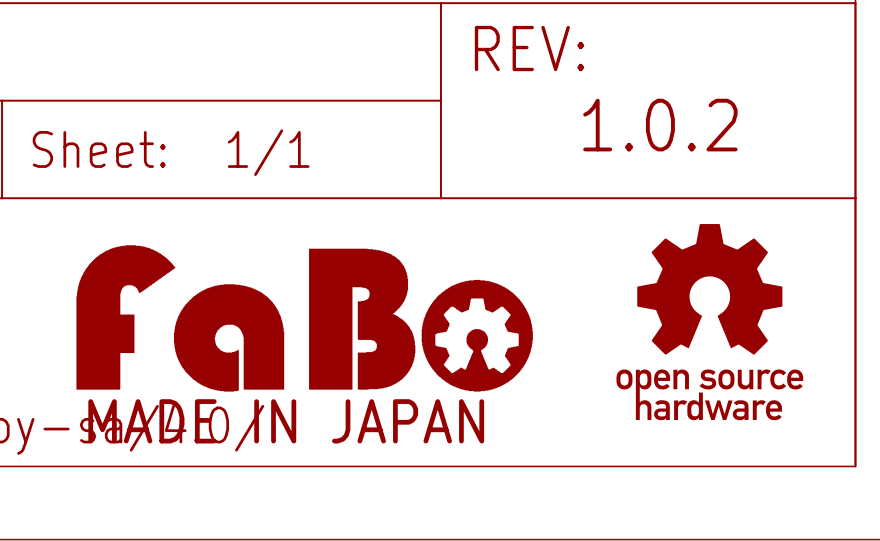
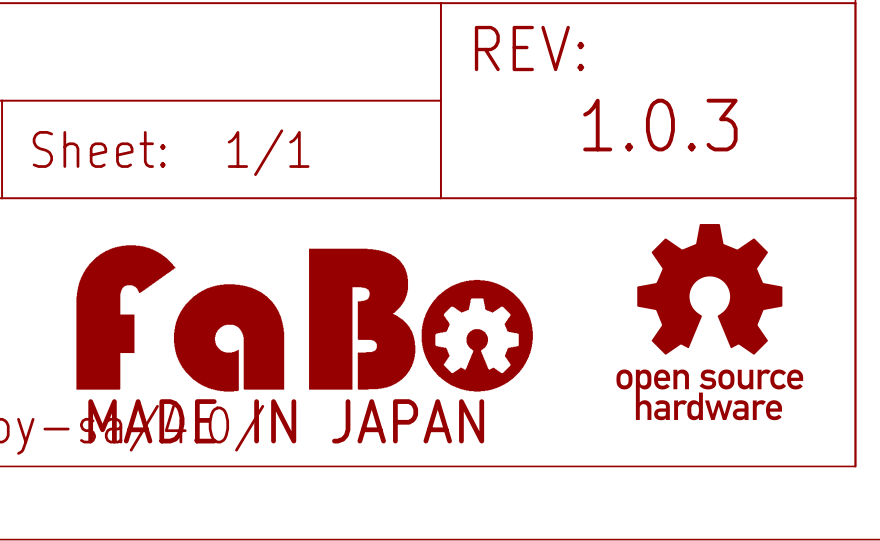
text: 1.0.2 (660, 125) -> 1.0.3 (660, 125)

